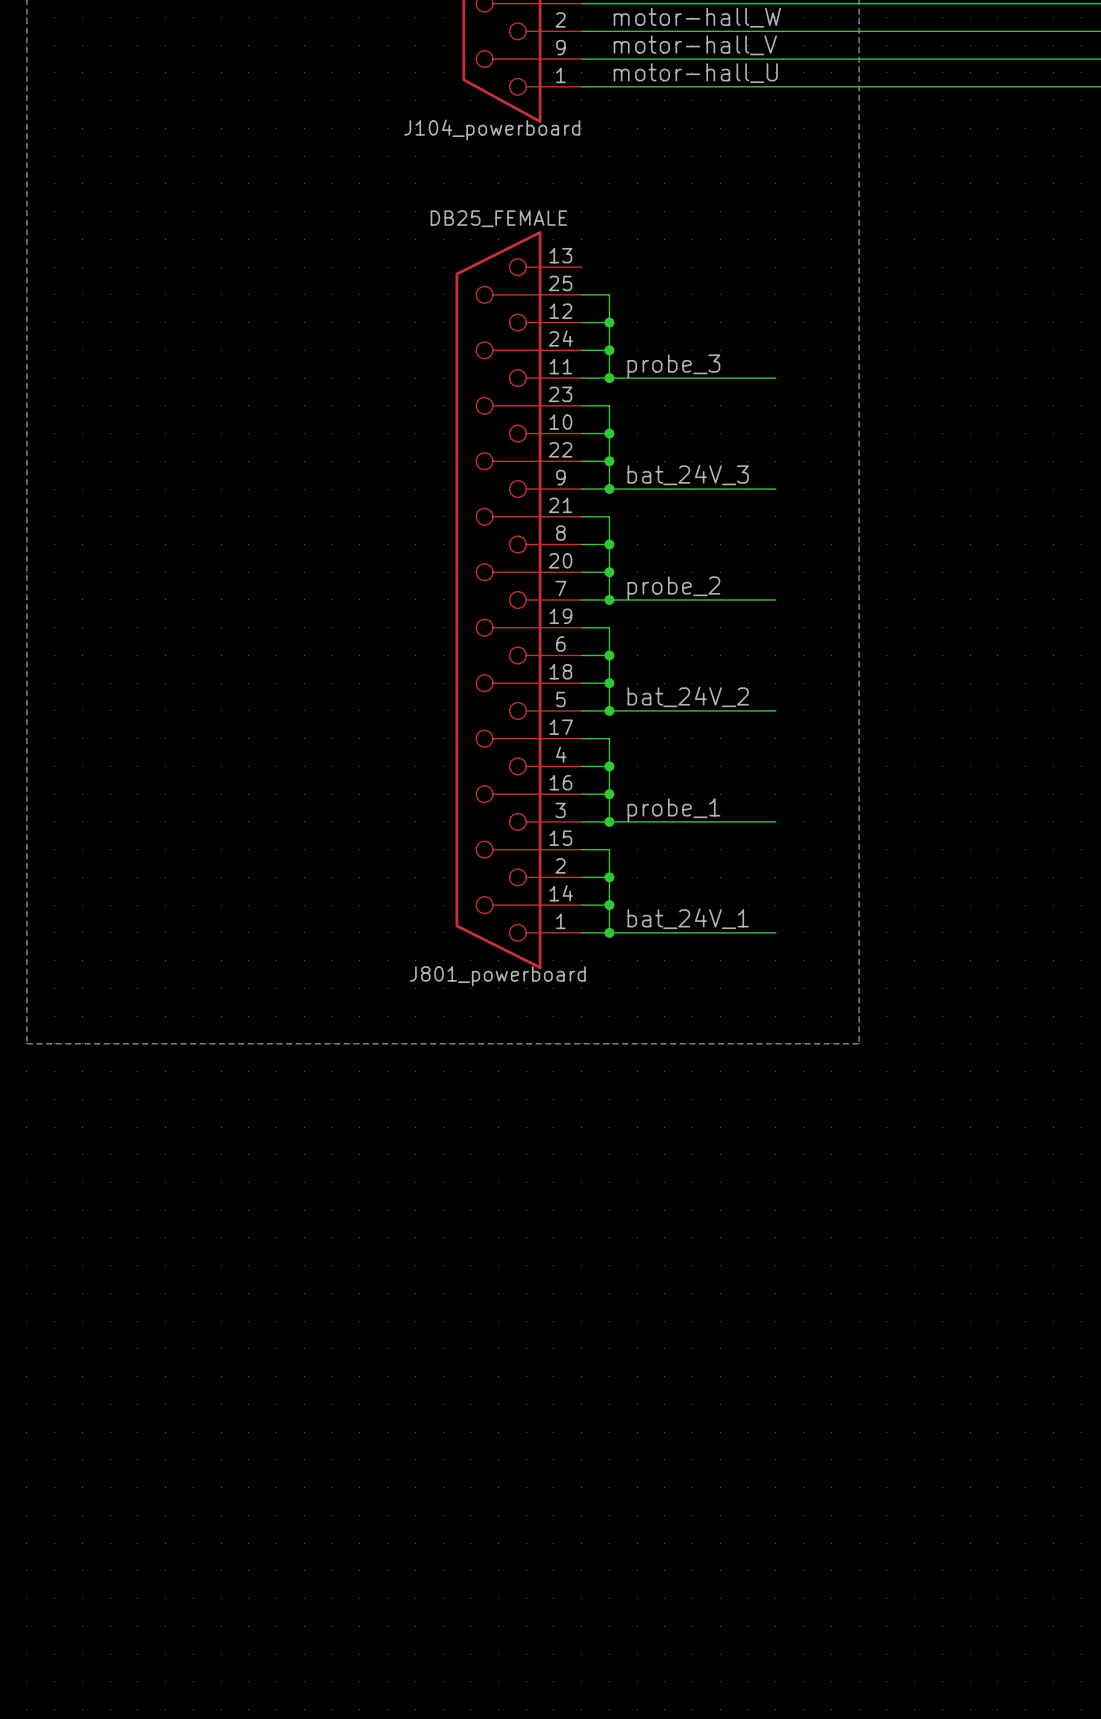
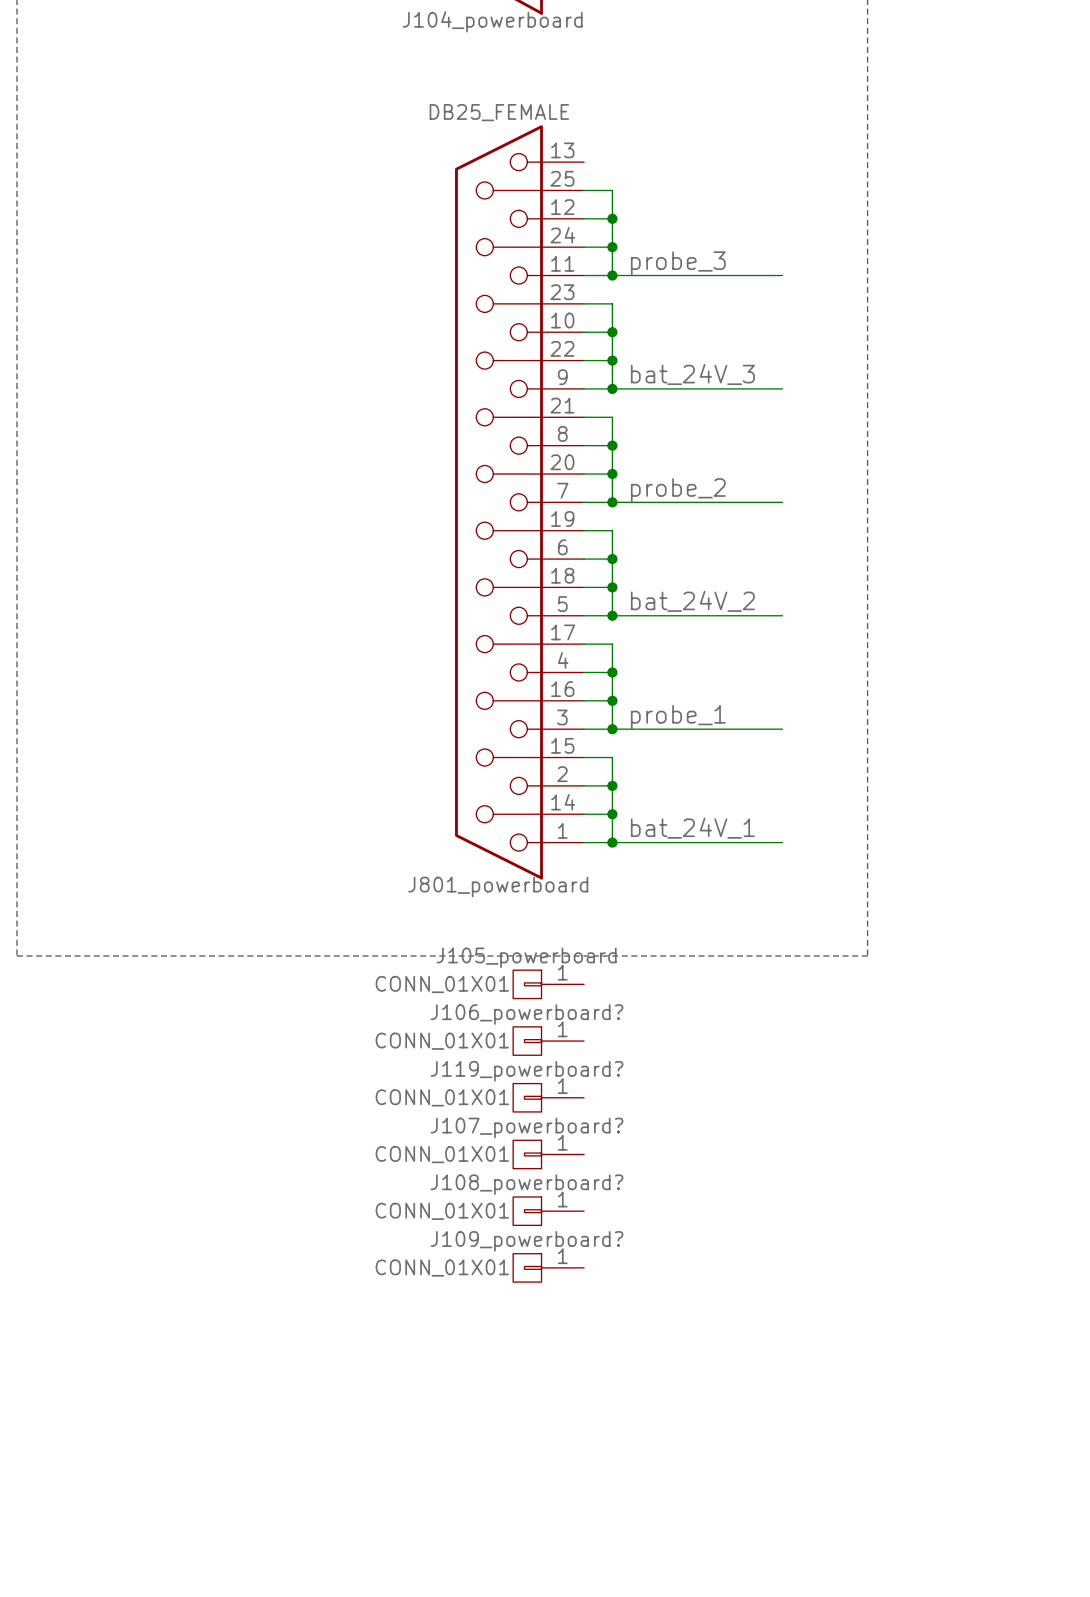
J105_powerboard: none -> CONN_01X01 (548, 984)
J106_powerboard?: none -> CONN_01X01 (548, 1041)
J119_powerboard?: none -> CONN_01X01 (548, 1097)
J107_powerboard?: none -> CONN_01X01 (548, 1154)
J108_powerboard?: none -> CONN_01X01 (548, 1211)
J109_powerboard?: none -> CONN_01X01 (548, 1267)

